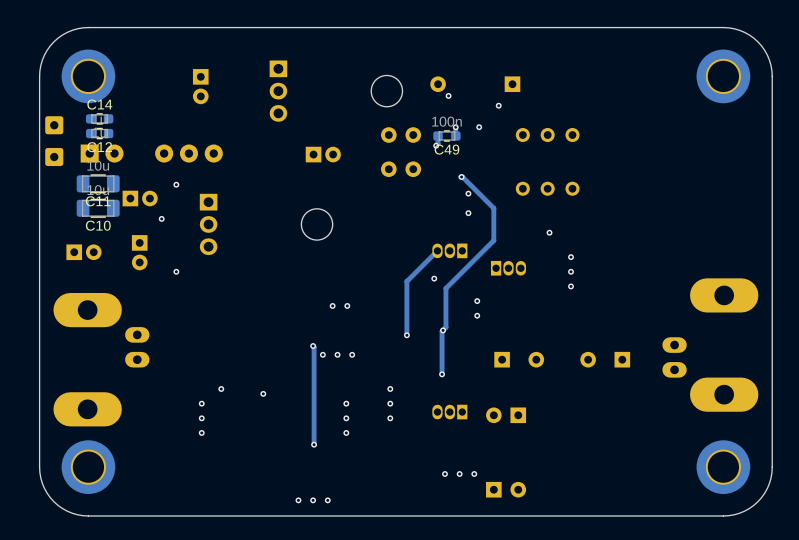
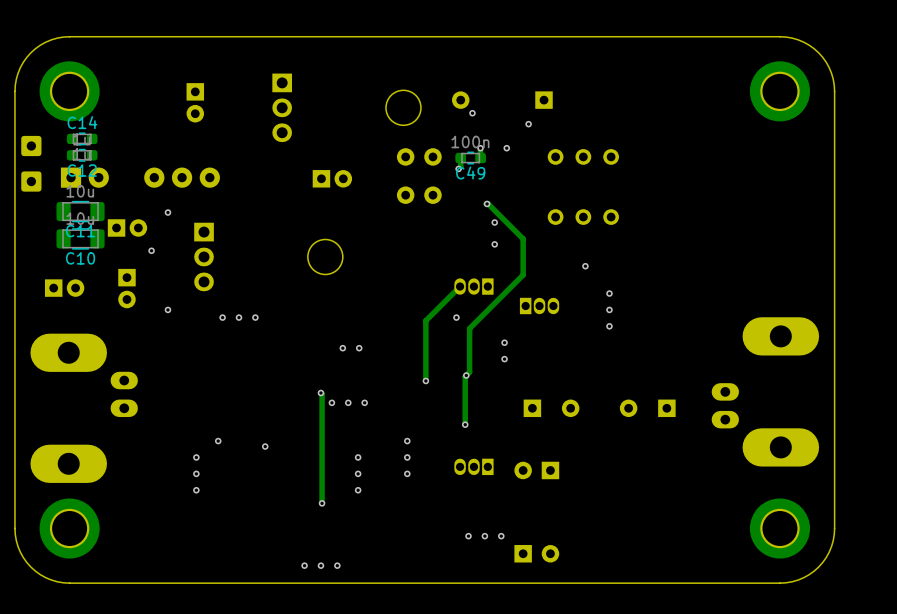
via: none -> (222, 317)
via: none -> (239, 317)
via: none -> (255, 317)

